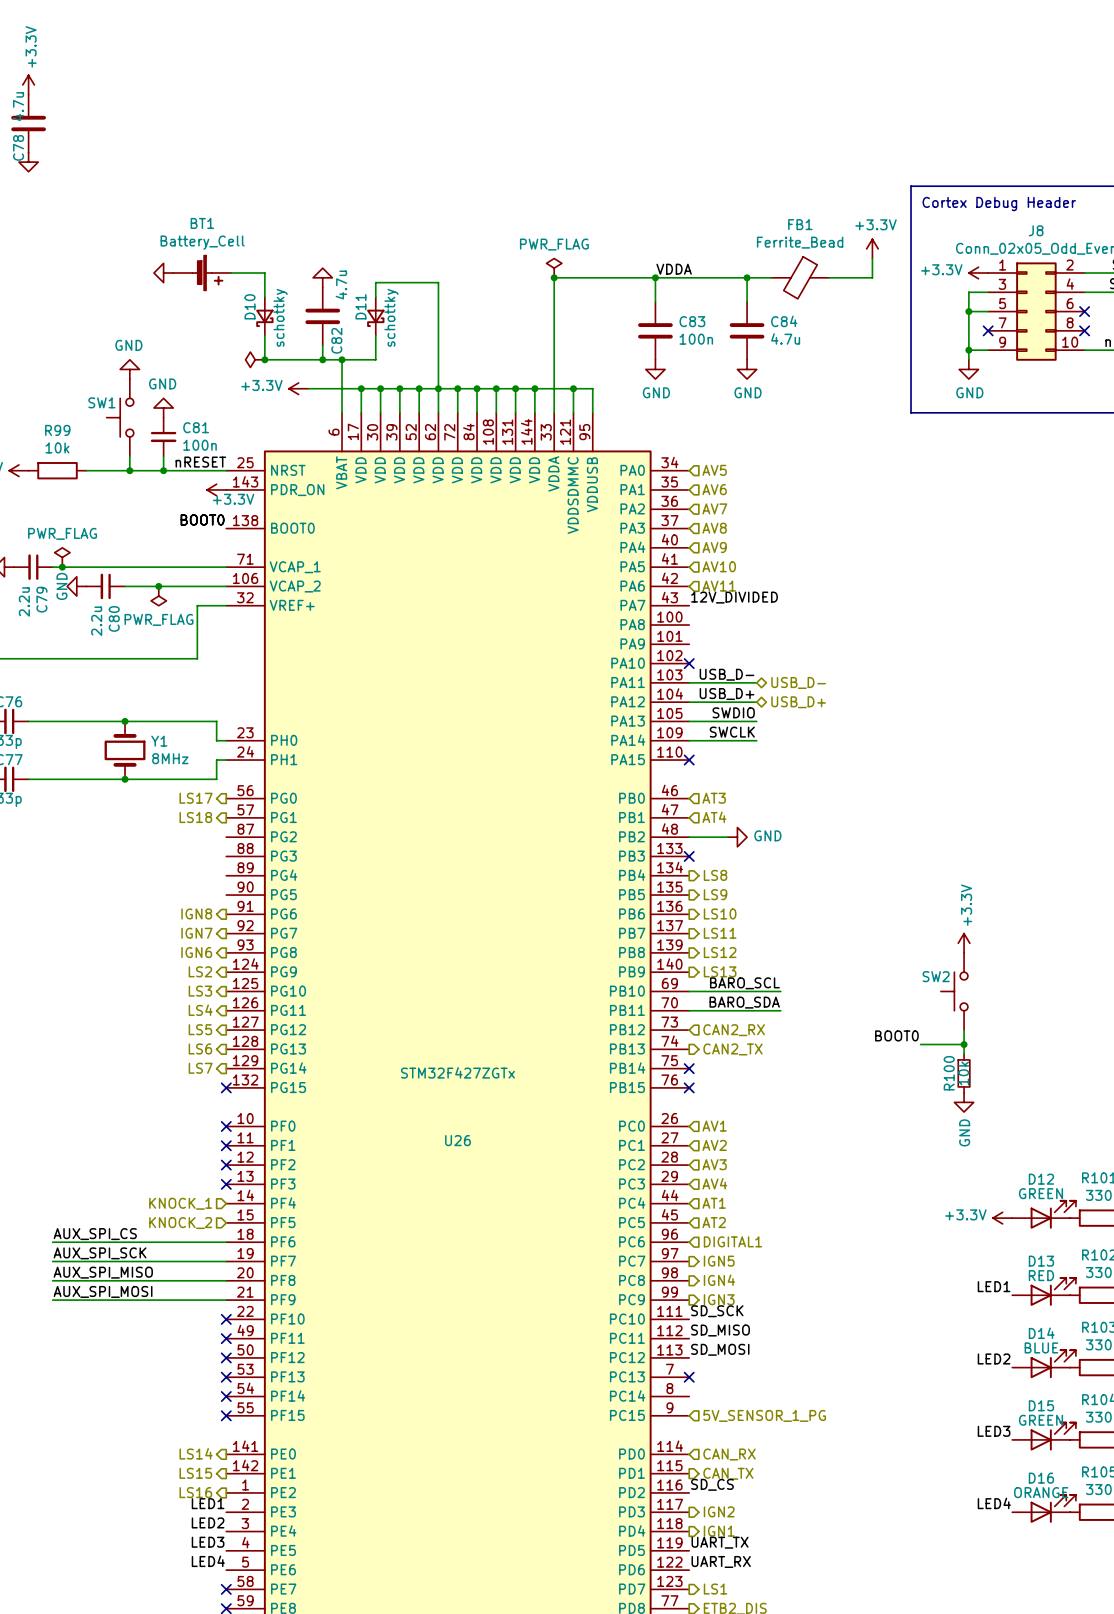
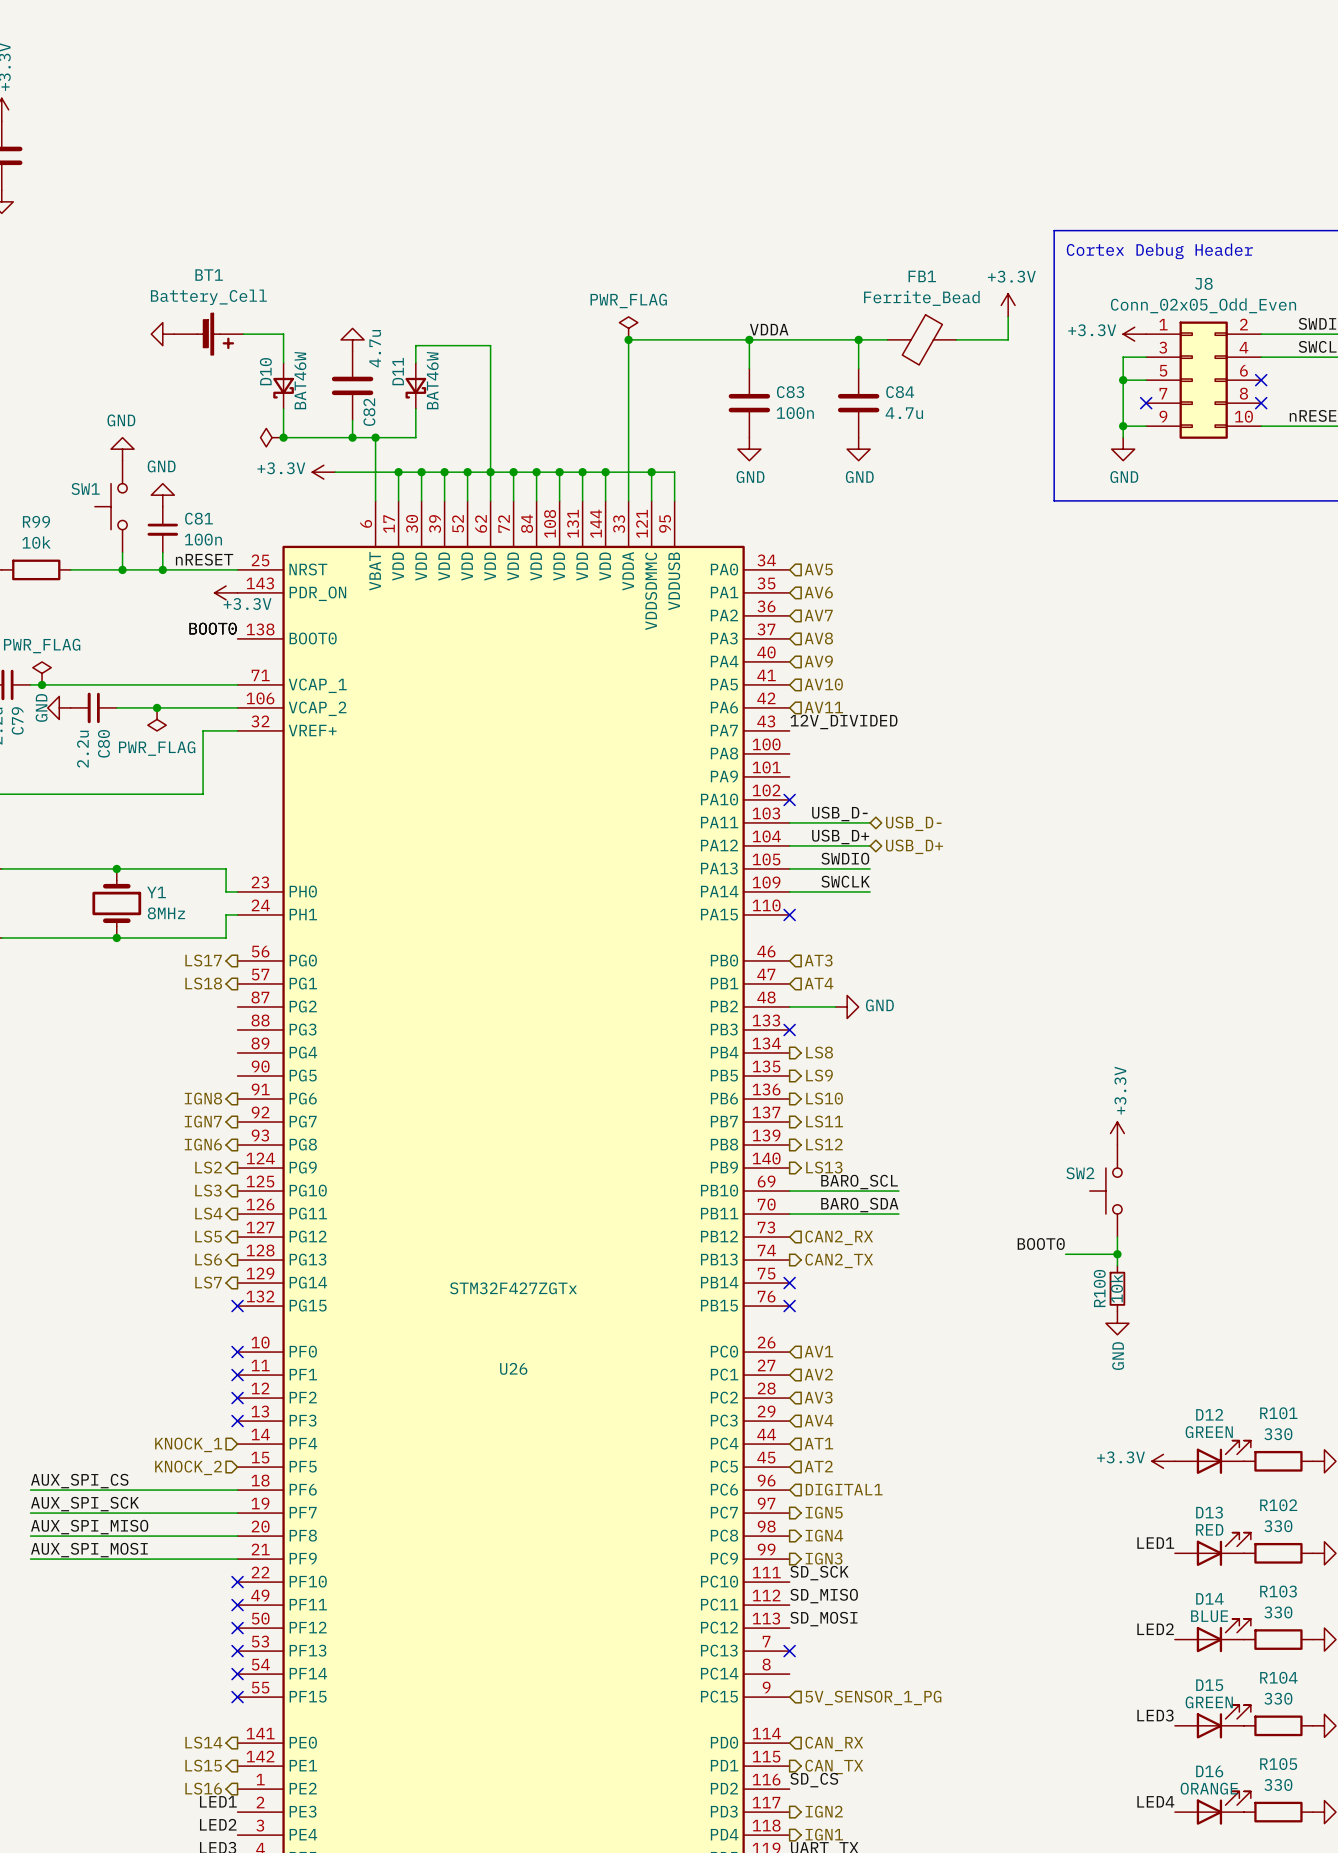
D10 value: schottky (280, 317) -> BAT46W (300, 380)
D11 value: schottky (391, 317) -> BAT46W (432, 380)

